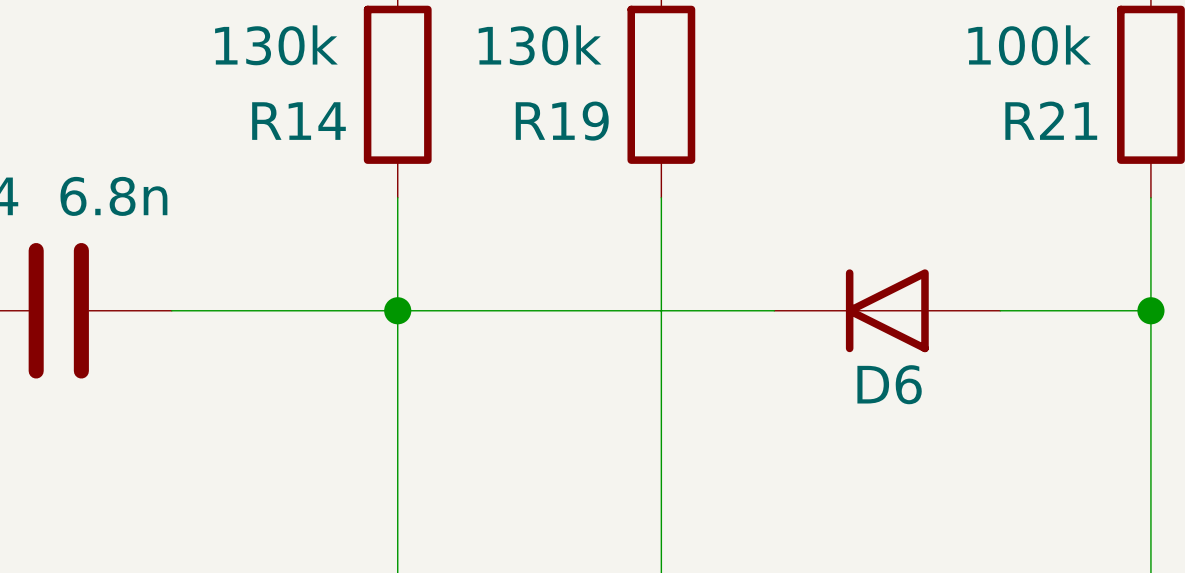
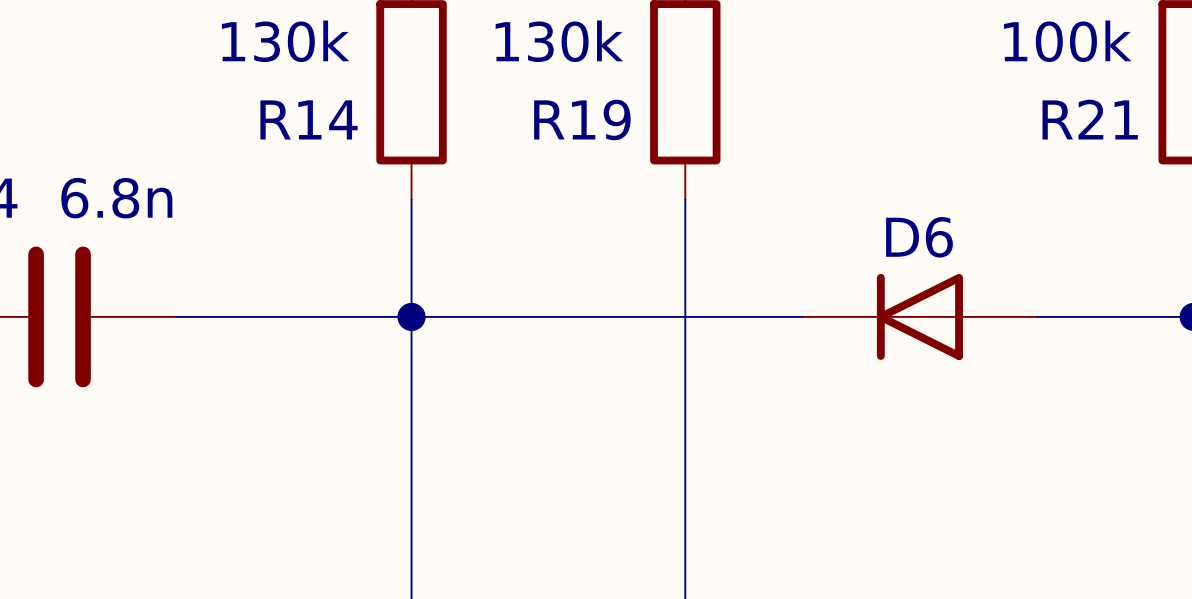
D6 name position: D6 (889, 384) -> D6 (919, 237)

